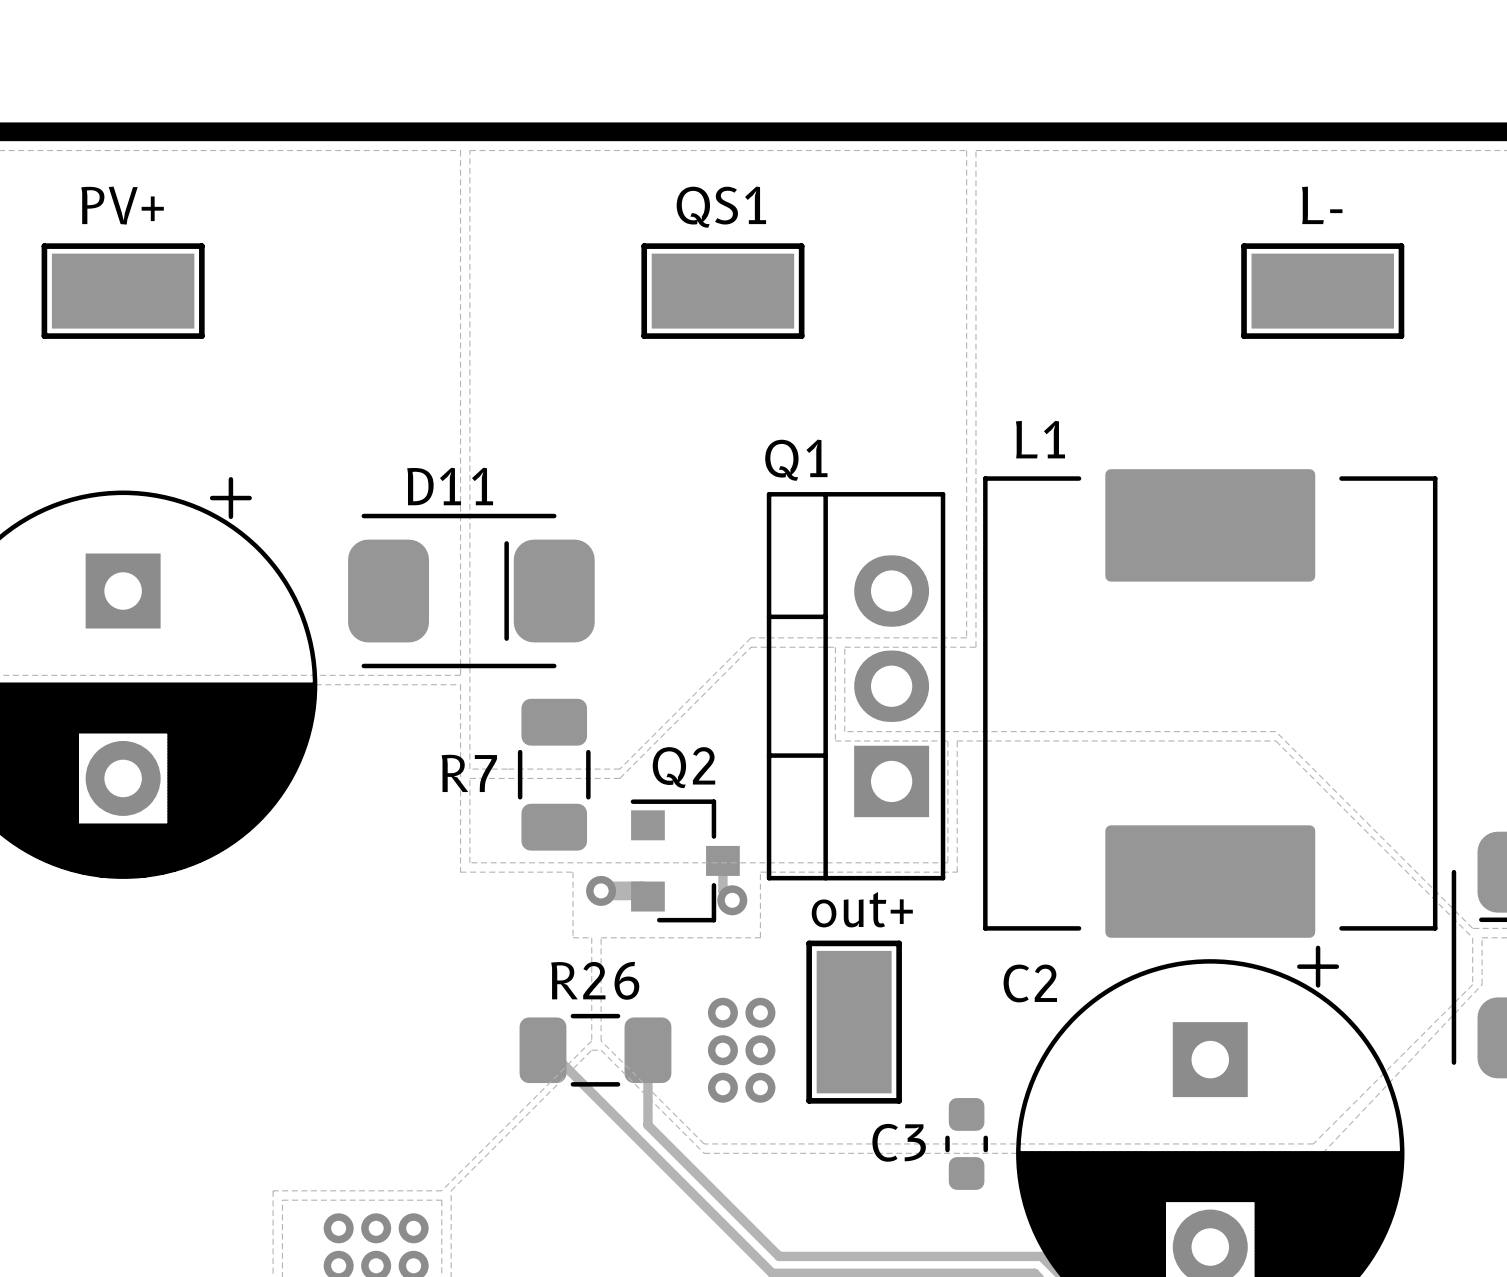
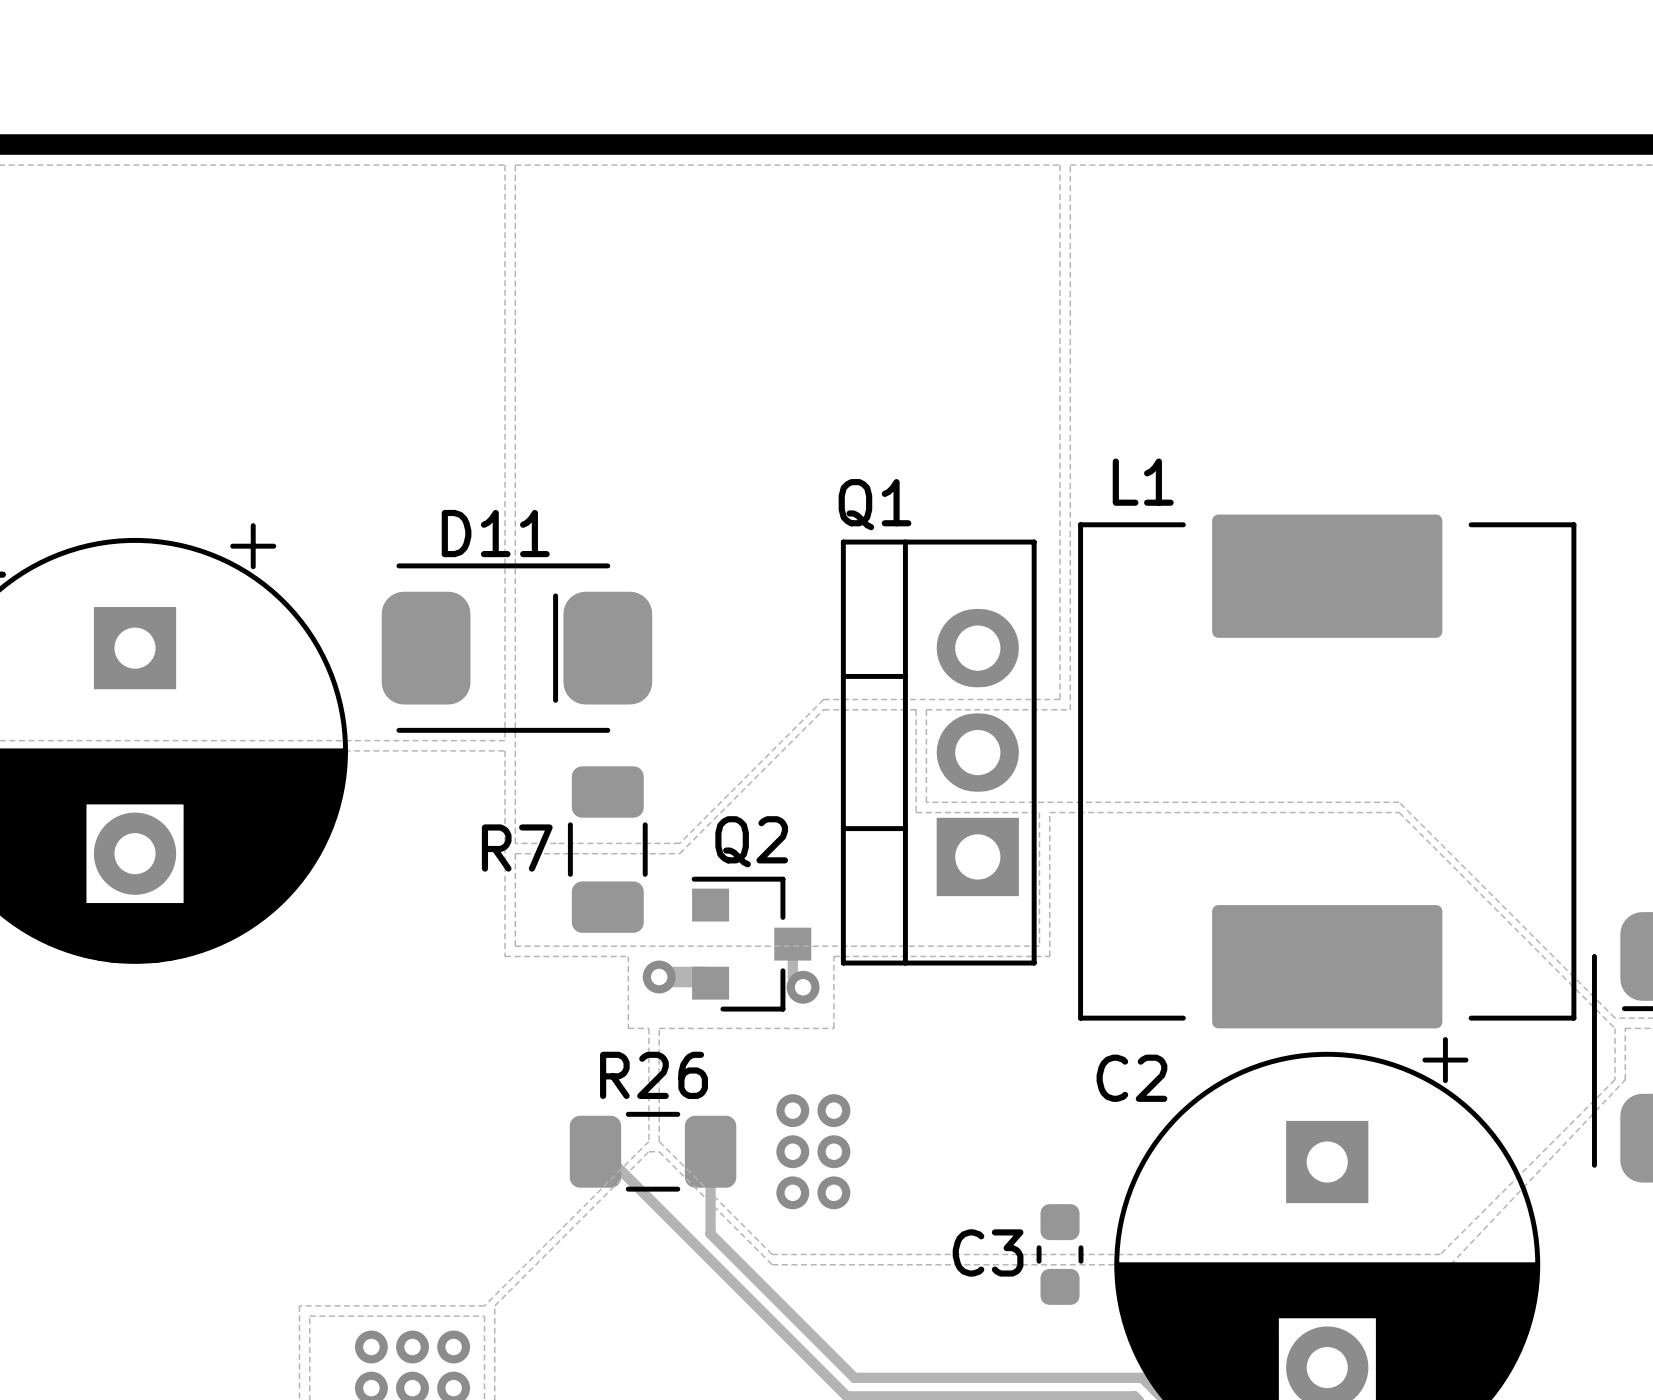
PV+: (123, 291) -> none
QS1: (722, 291) -> none
L-: (1322, 291) -> none
out+: (854, 1022) -> none

